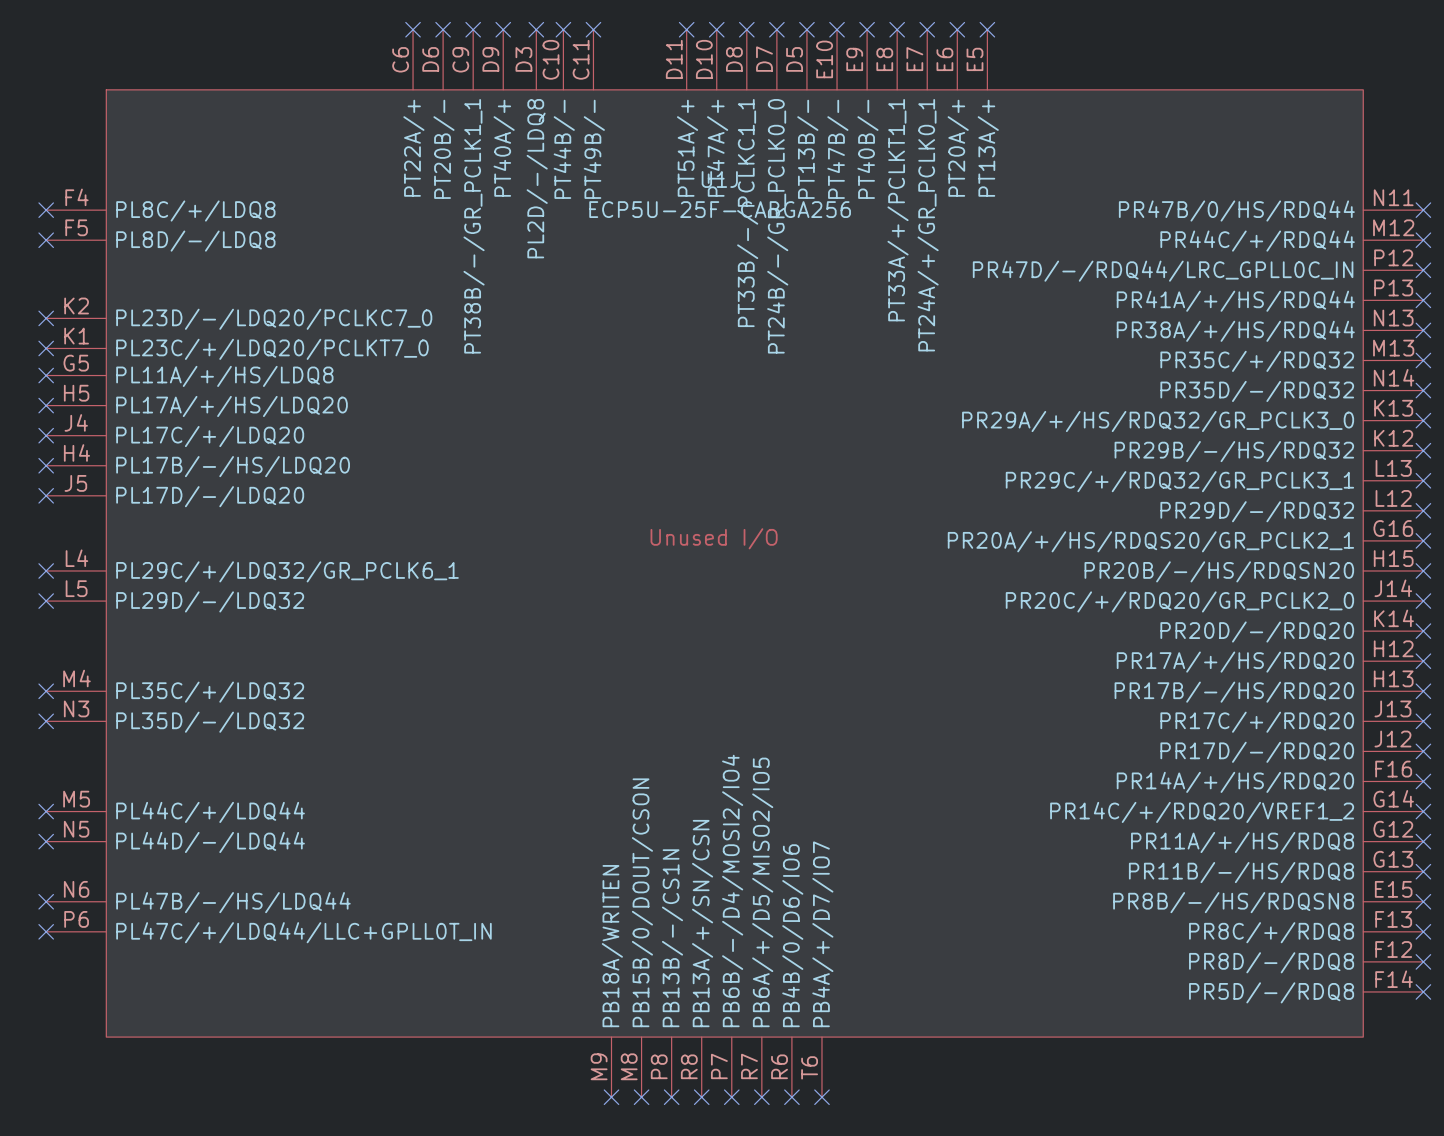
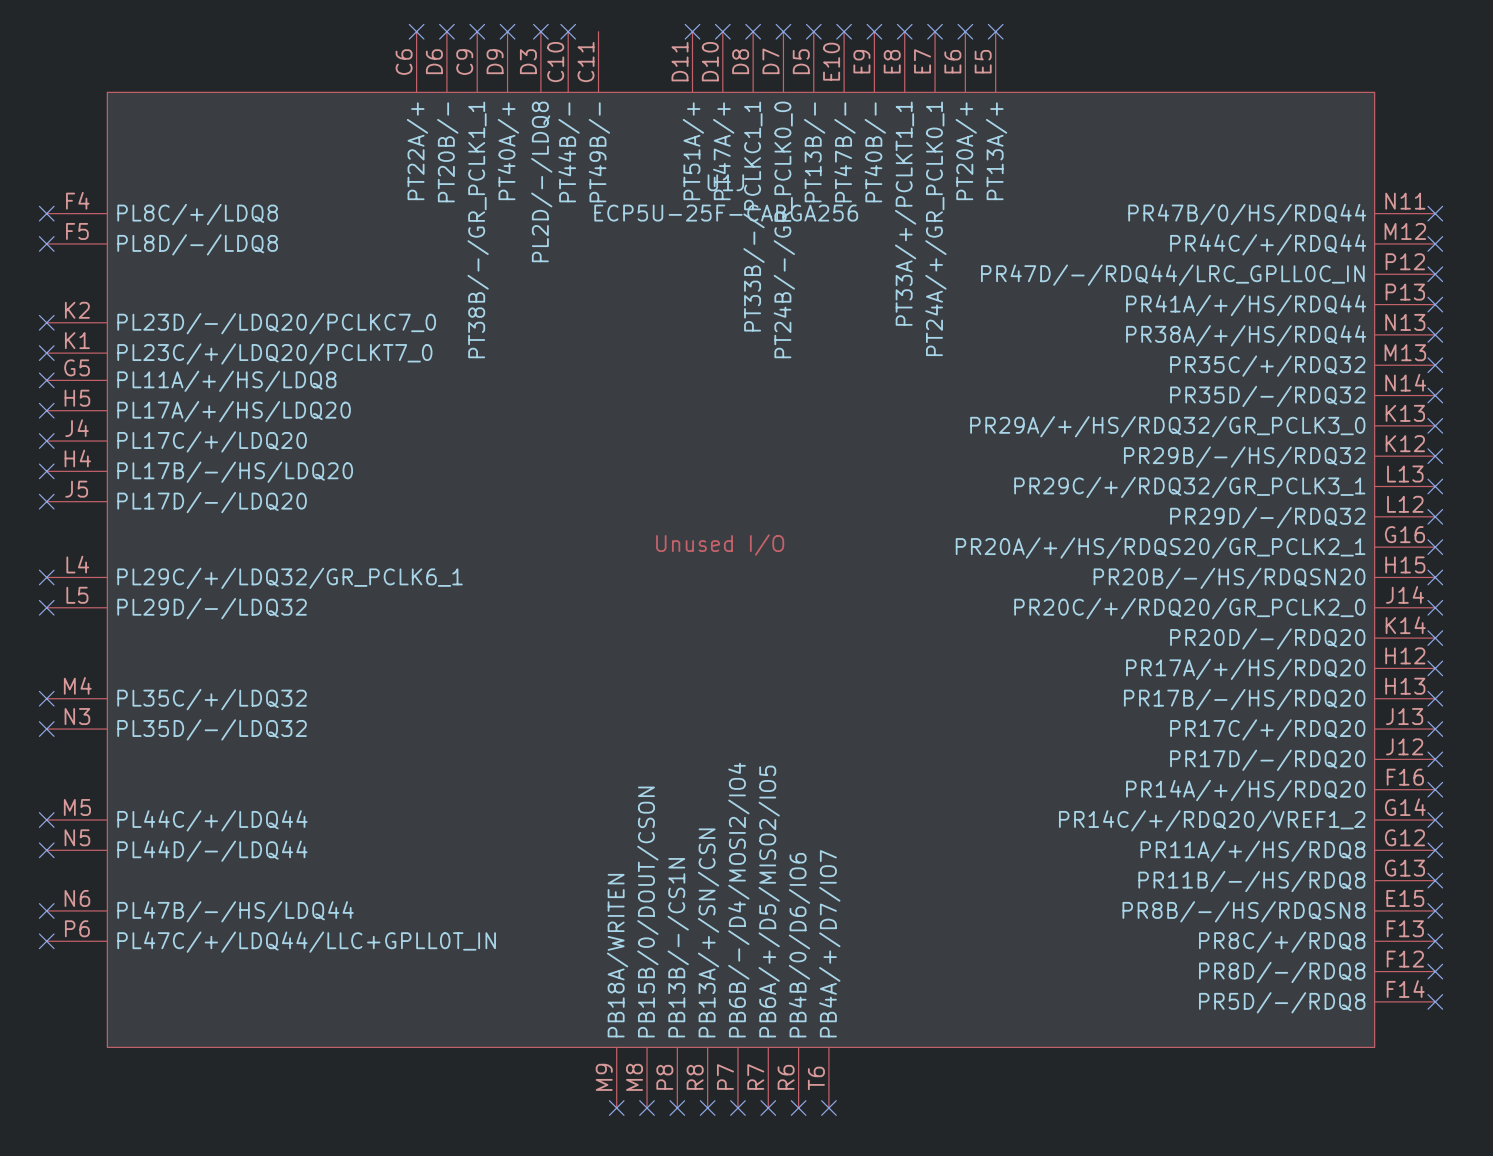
no-connect mark: (593, 29) -> none

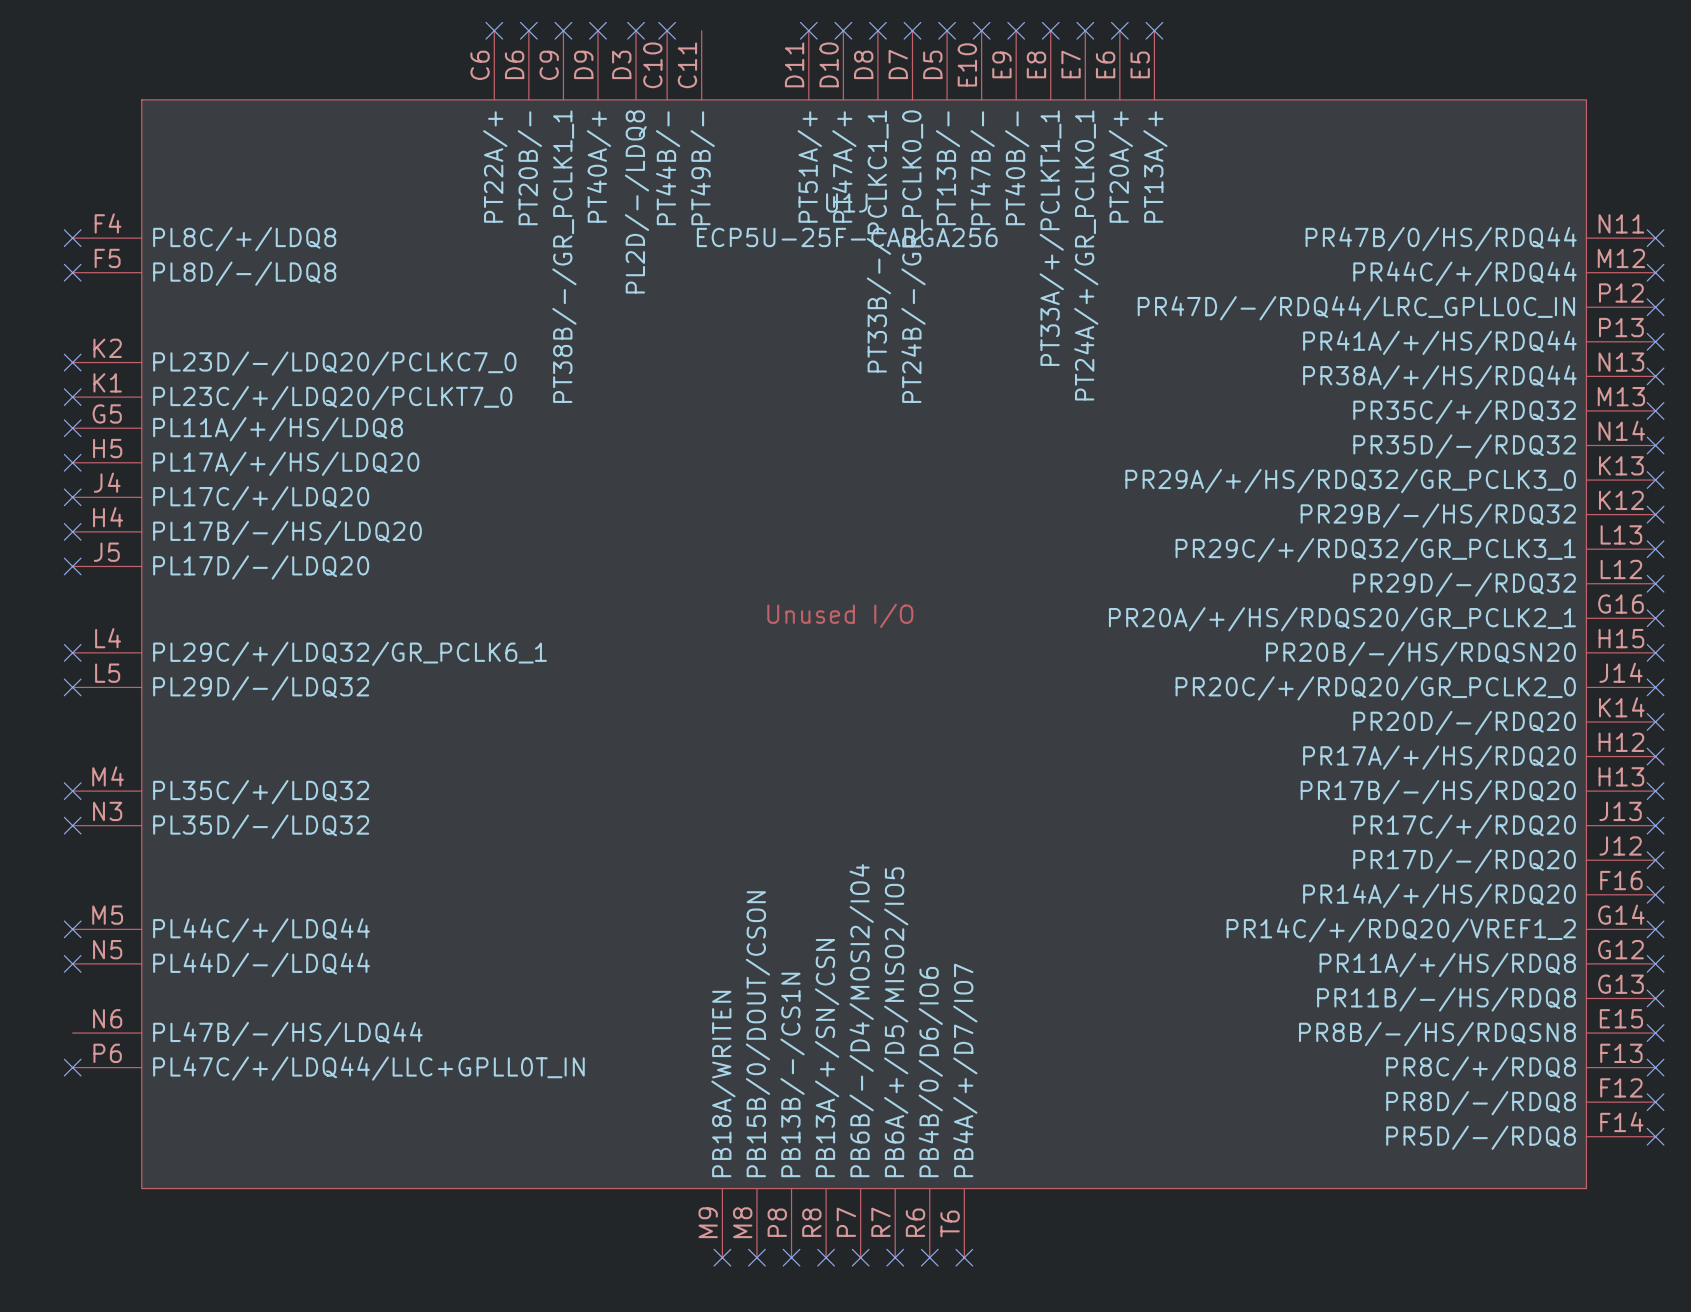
no-connect mark: (46, 910) -> none

